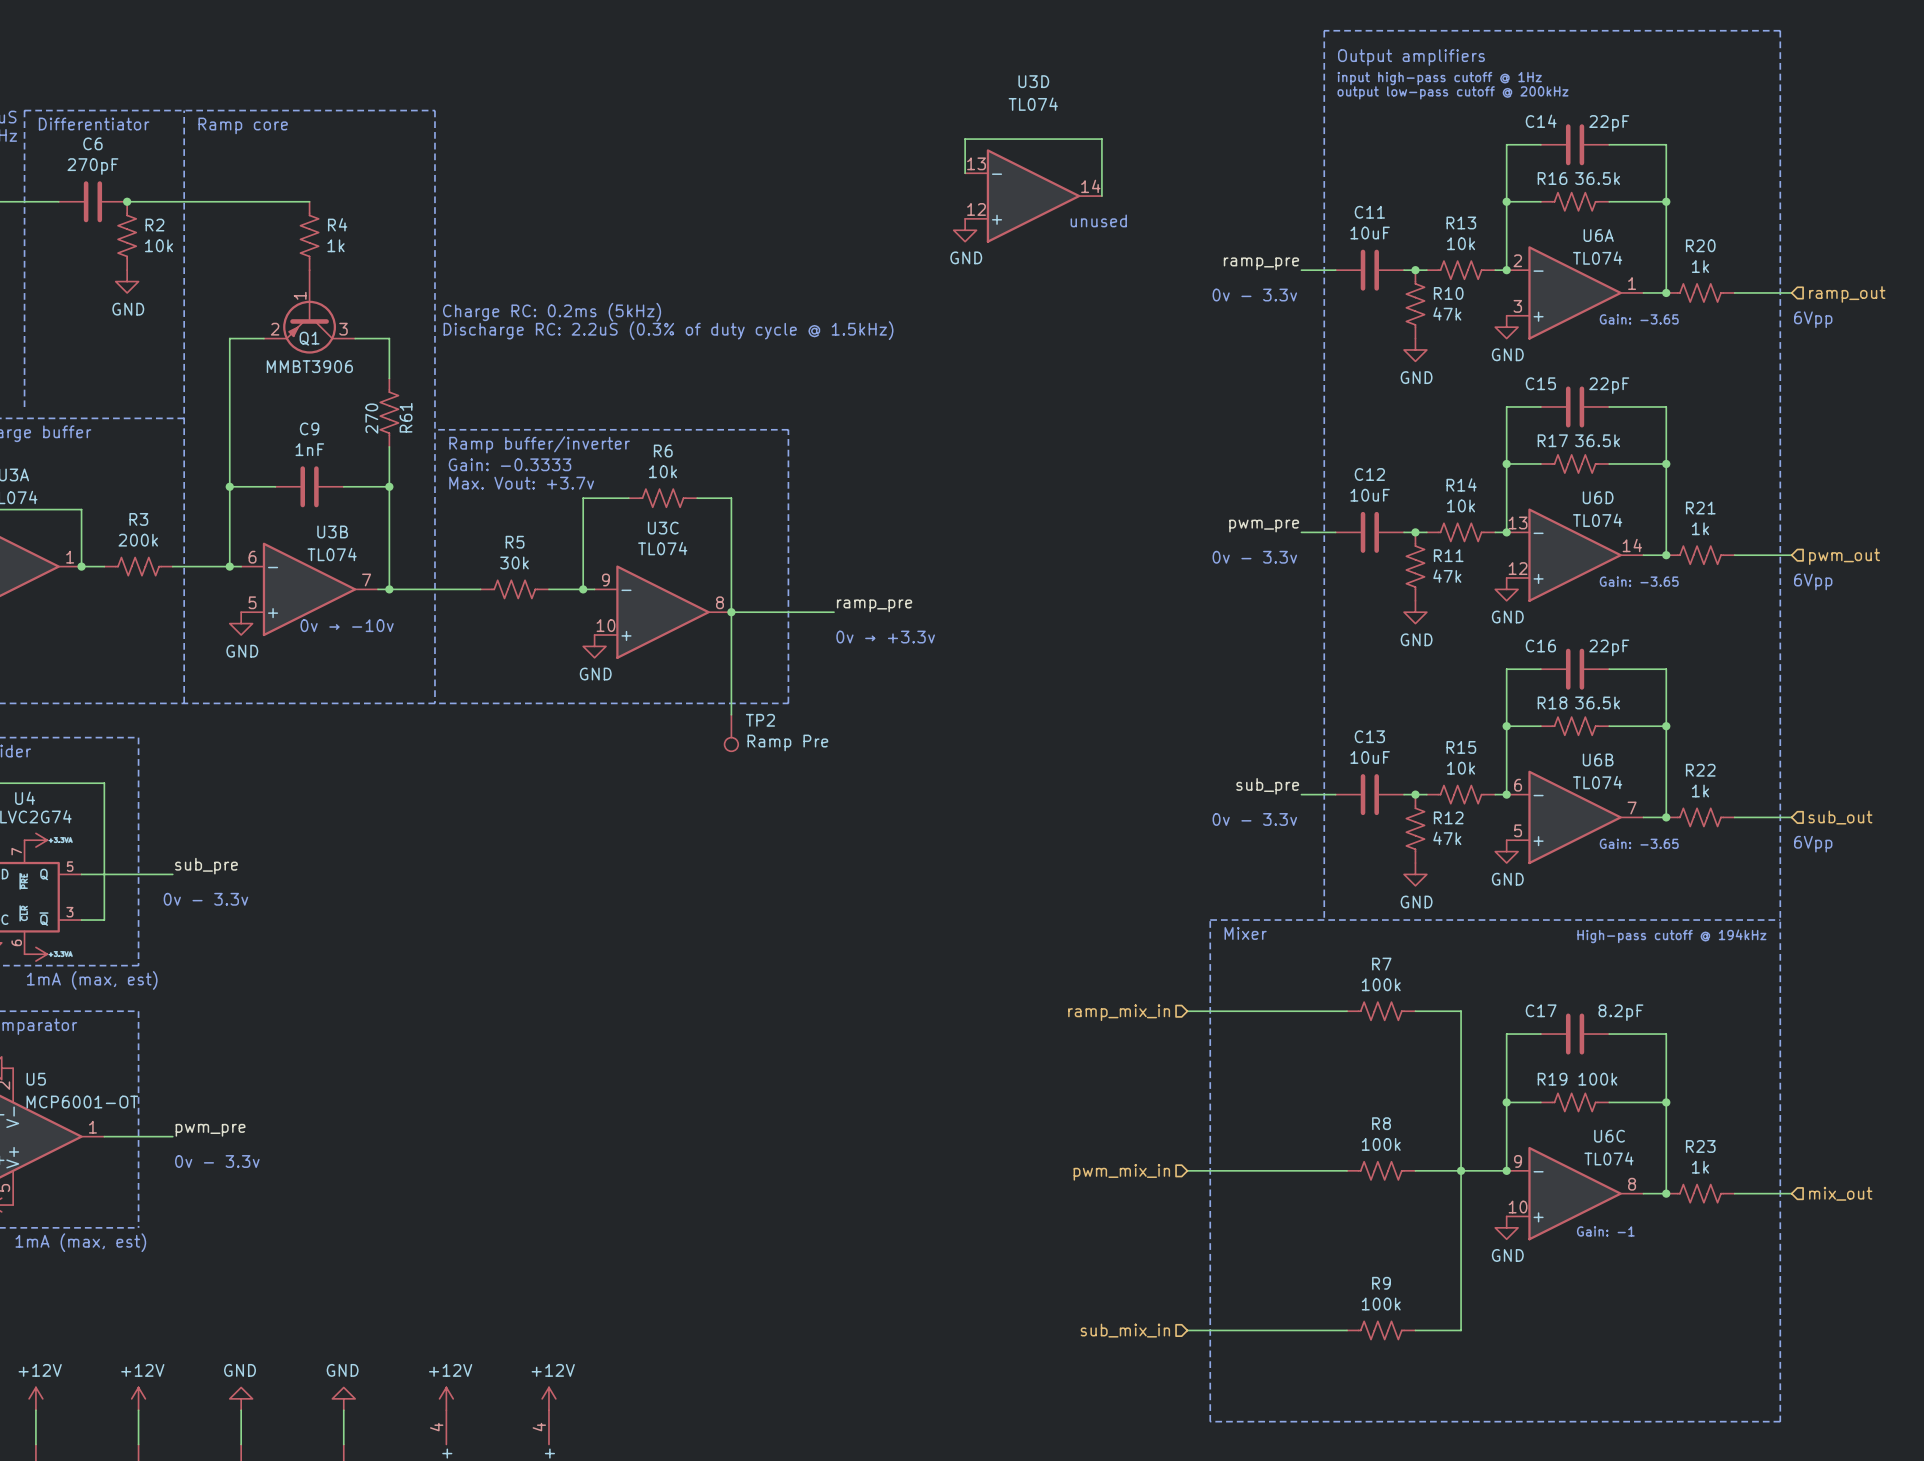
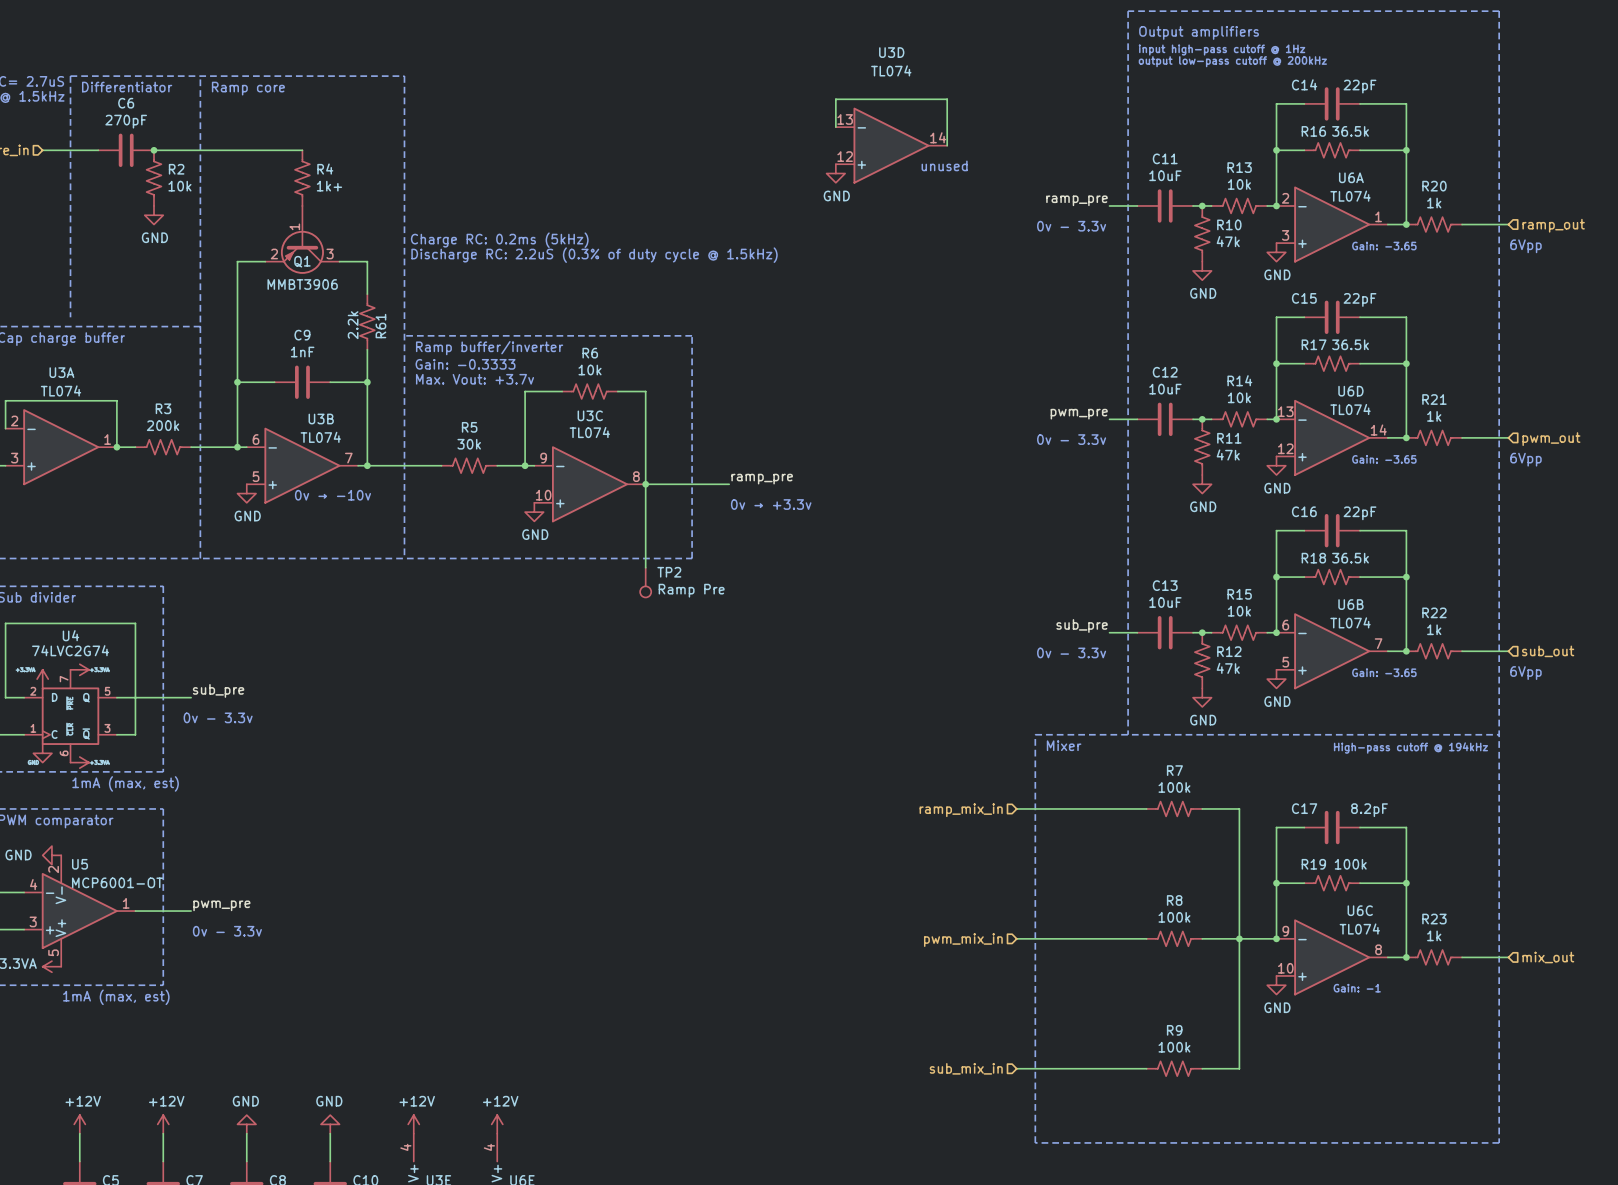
R4 value: 1k (336, 245) -> 1k+ (329, 186)
R61 value: 270 (371, 418) -> 2.2k (353, 325)

